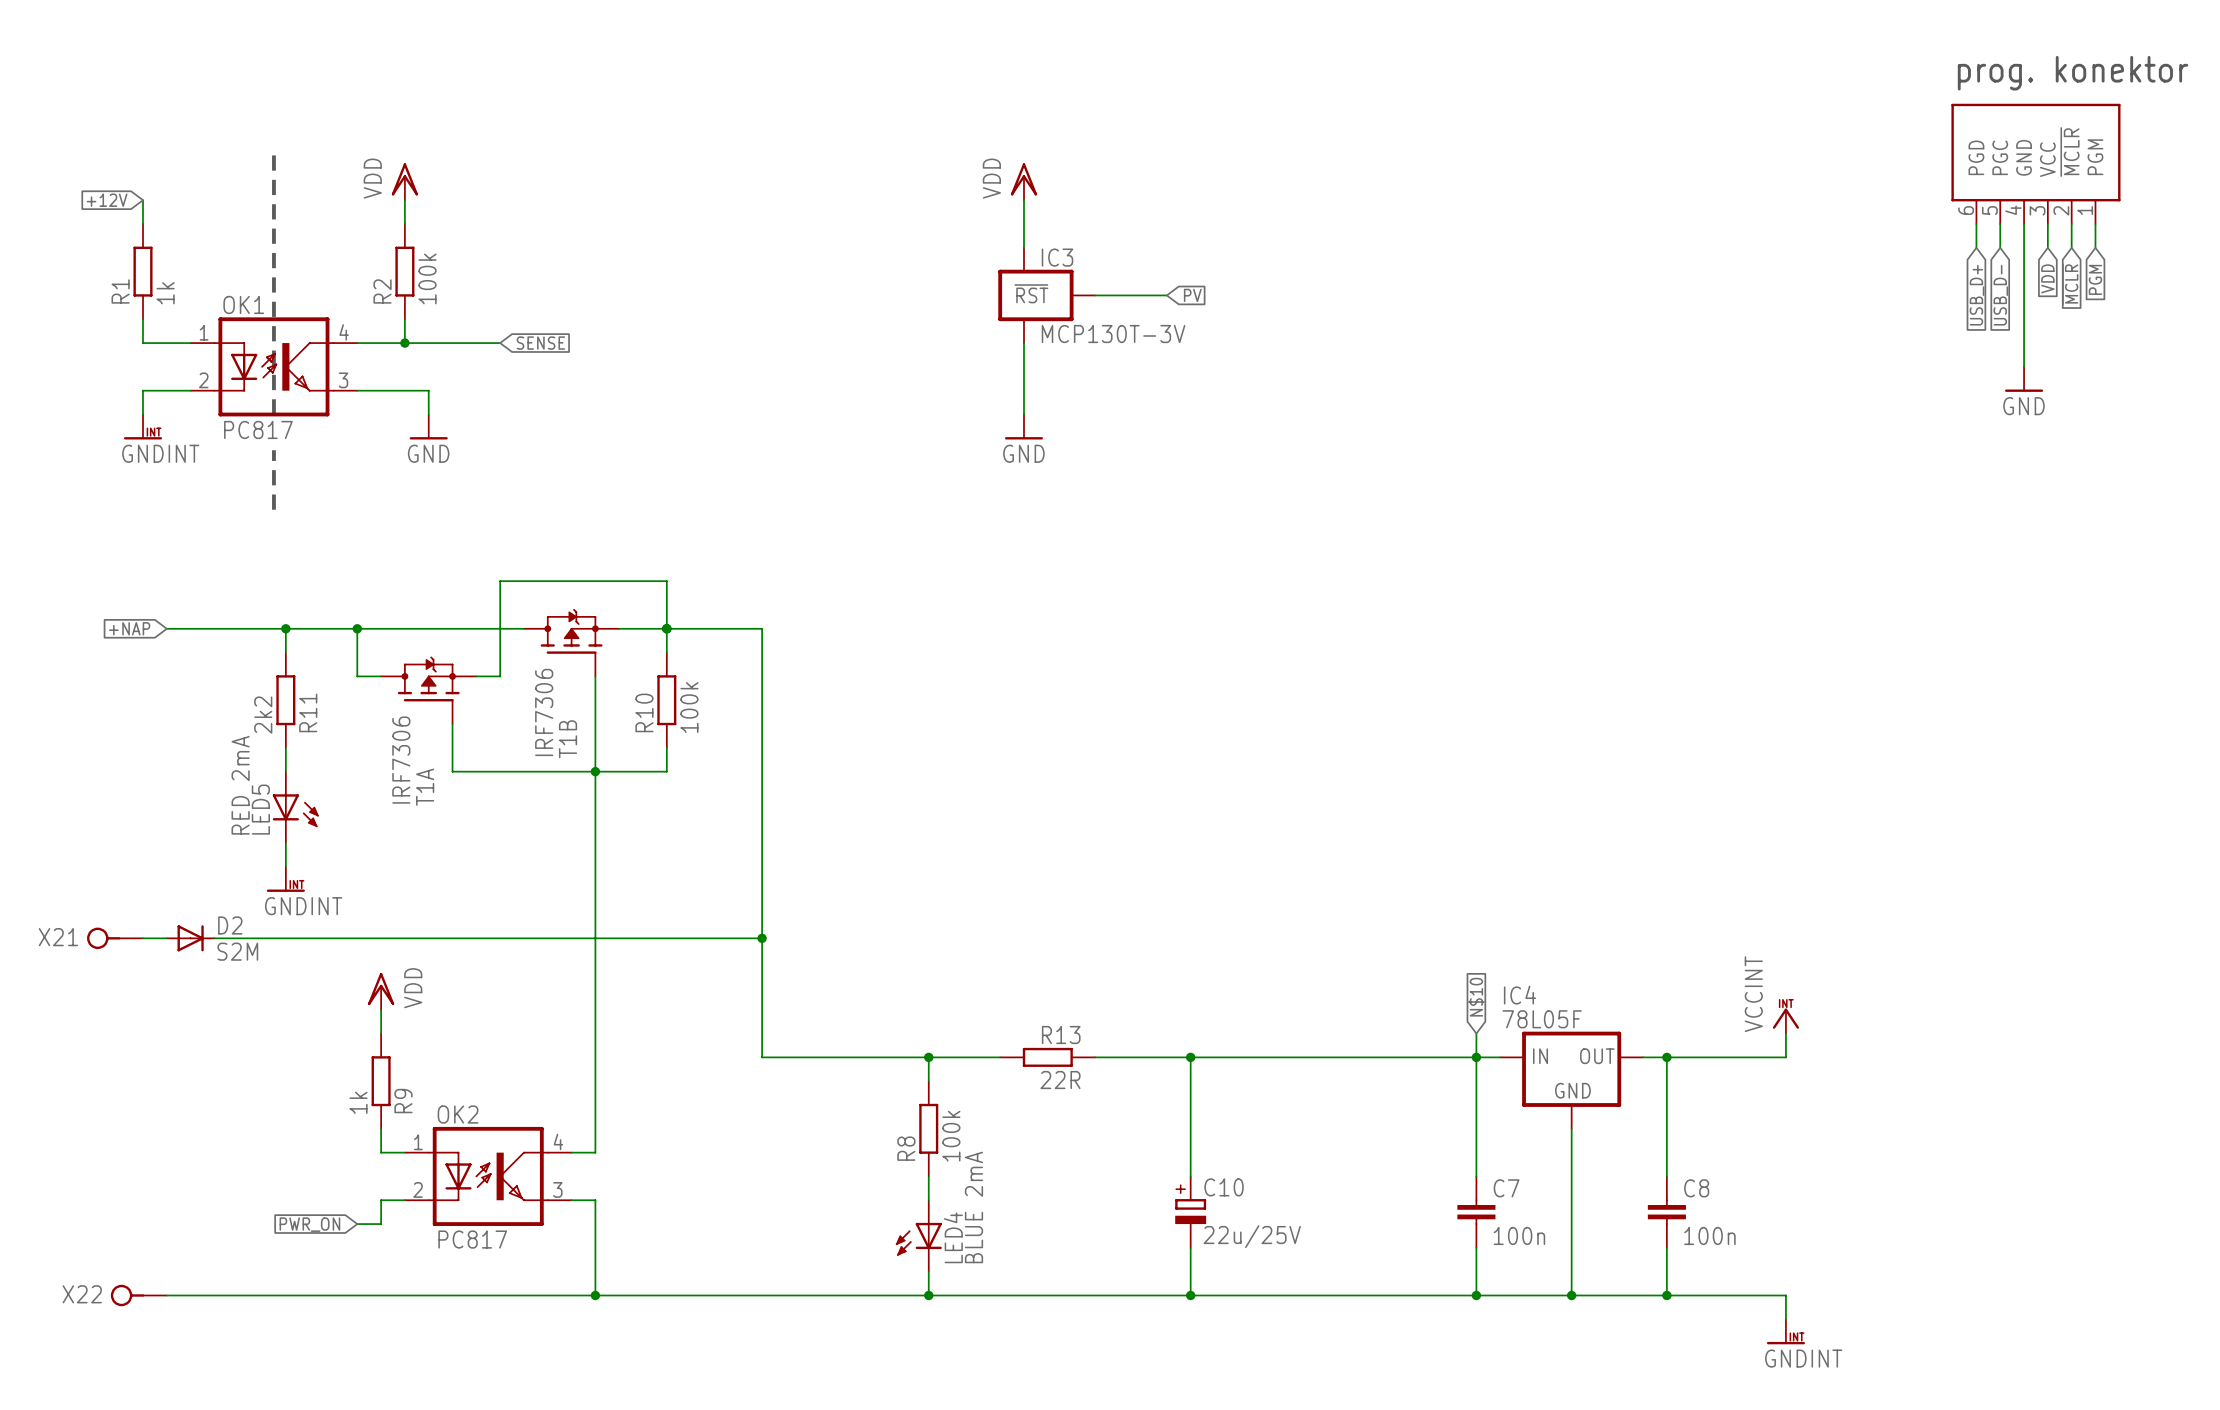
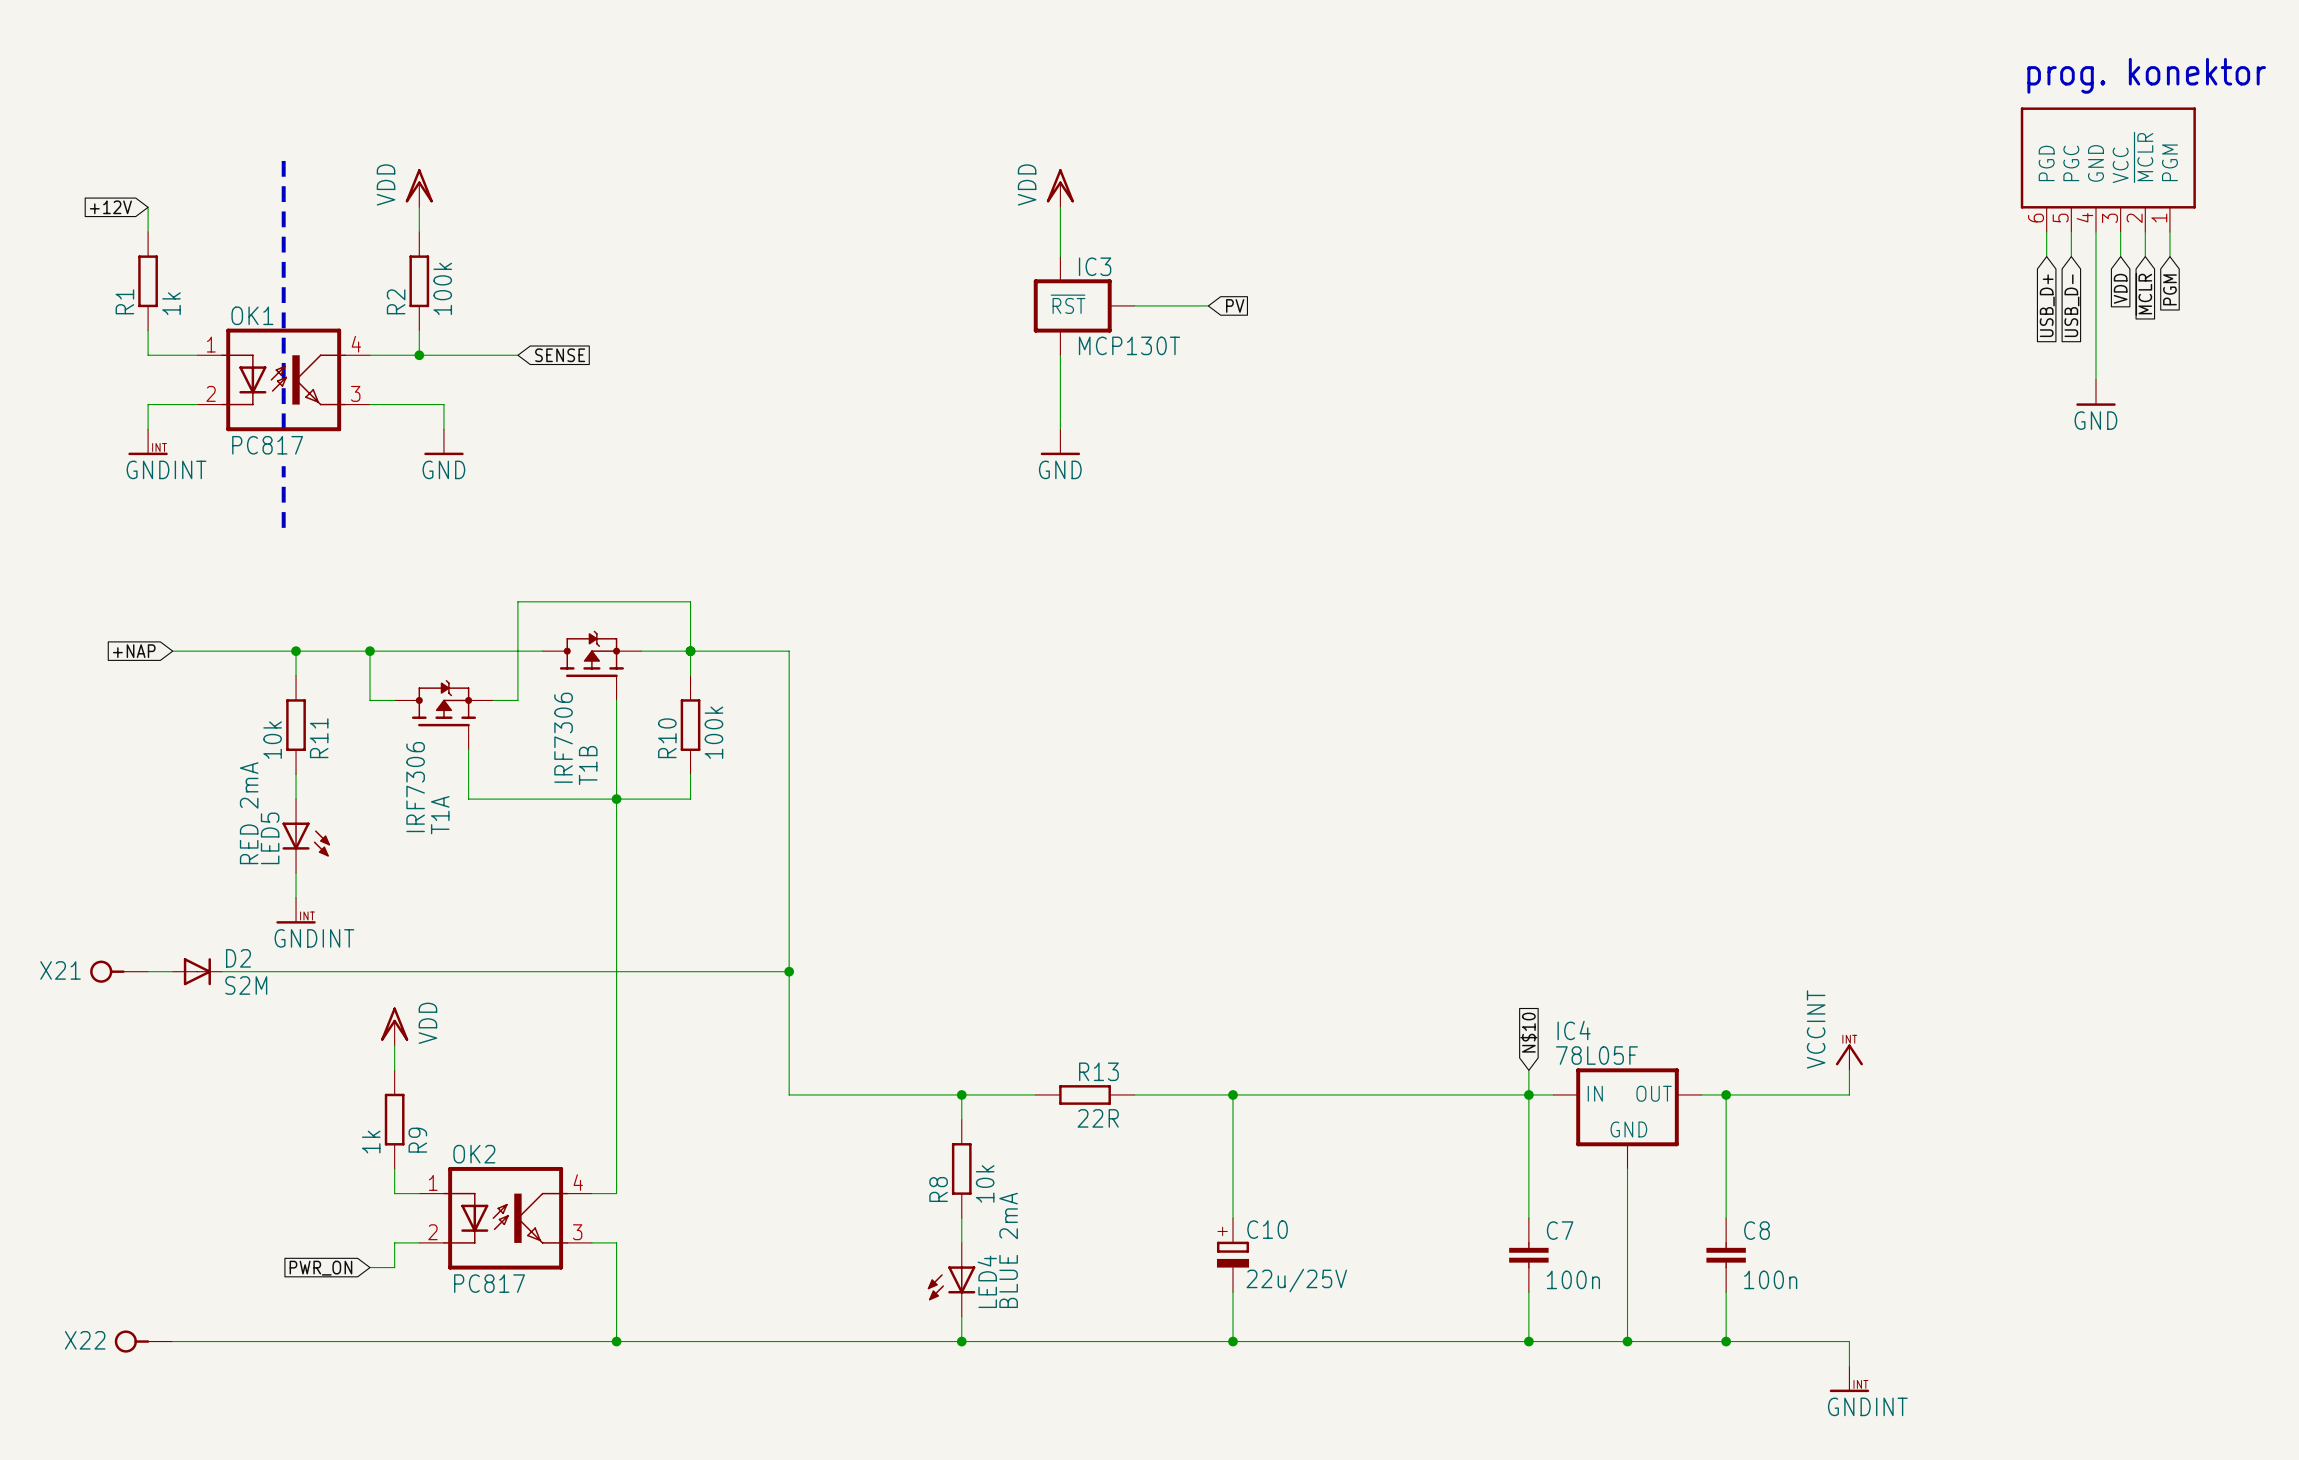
IC3 value: MCP130T-3V (1113, 334) -> MCP130T (1129, 345)
R11 value: 2k2 (263, 715) -> 10k (272, 740)
R8 value: 100k (951, 1136) -> 10k (985, 1183)

